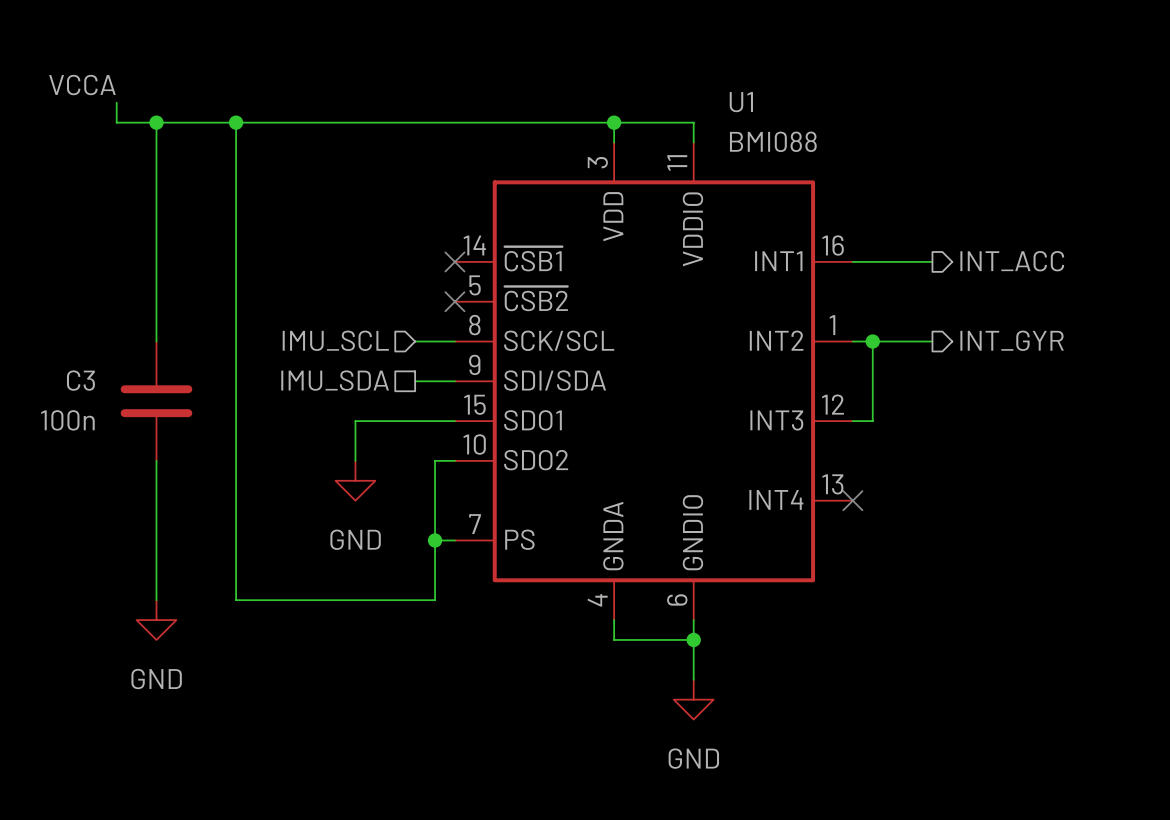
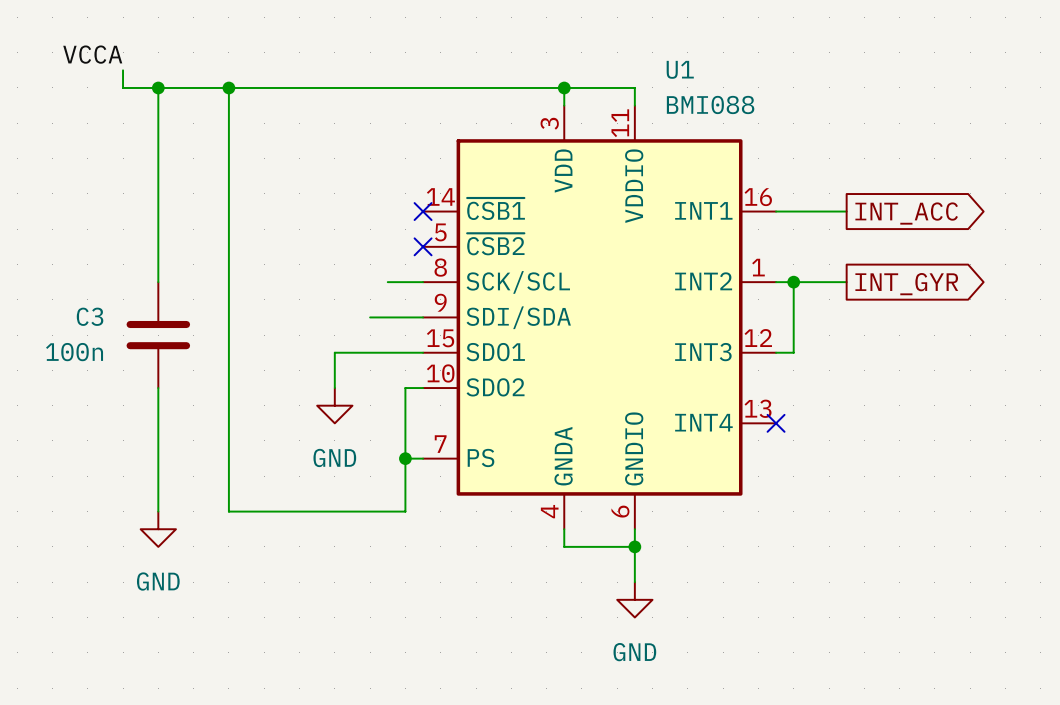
global label: none -> INT_ACC (906, 213)
hierarchical label: INT_ACC (1012, 261) -> none
hierarchical label: IMU_SCL (335, 340) -> none
hierarchical label: INT_GYR (1012, 340) -> none
global label: none -> INT_GYR (906, 284)
hierarchical label: IMU_SDA (335, 380) -> none
wire: none -> (370, 317) (387, 317)

